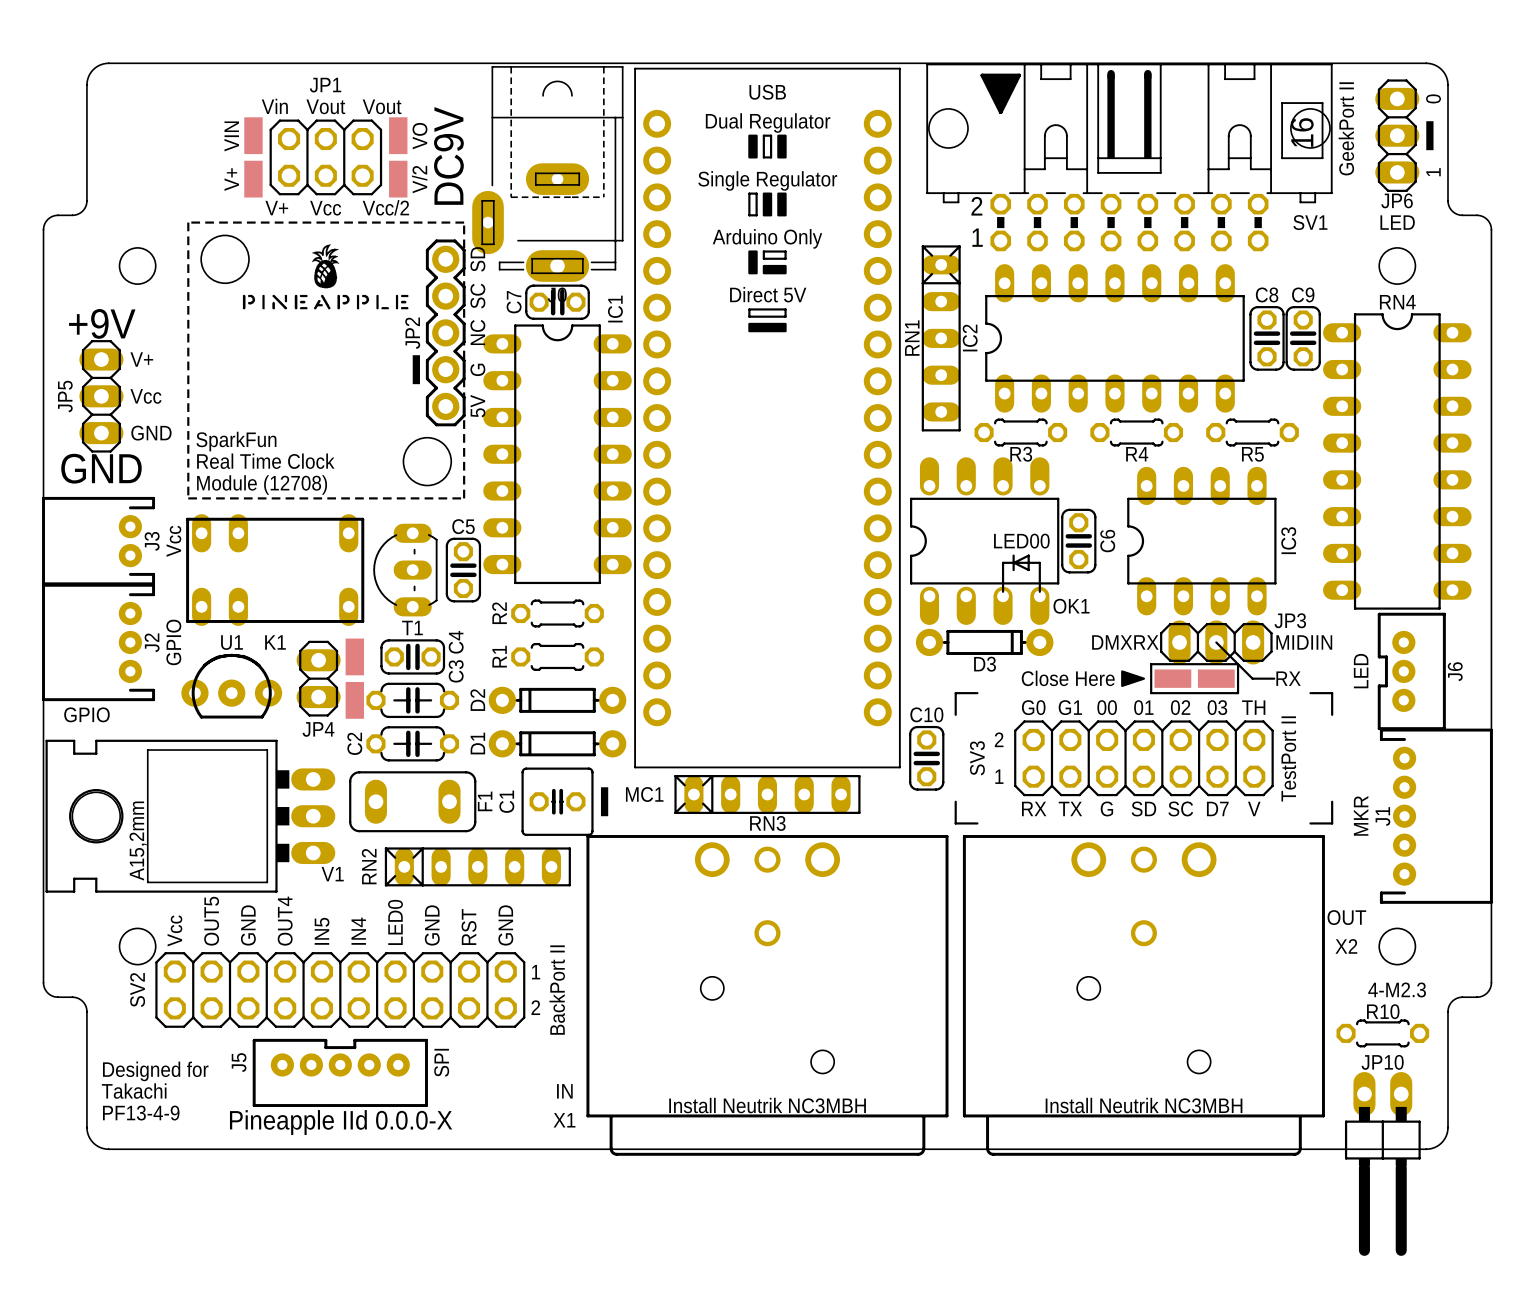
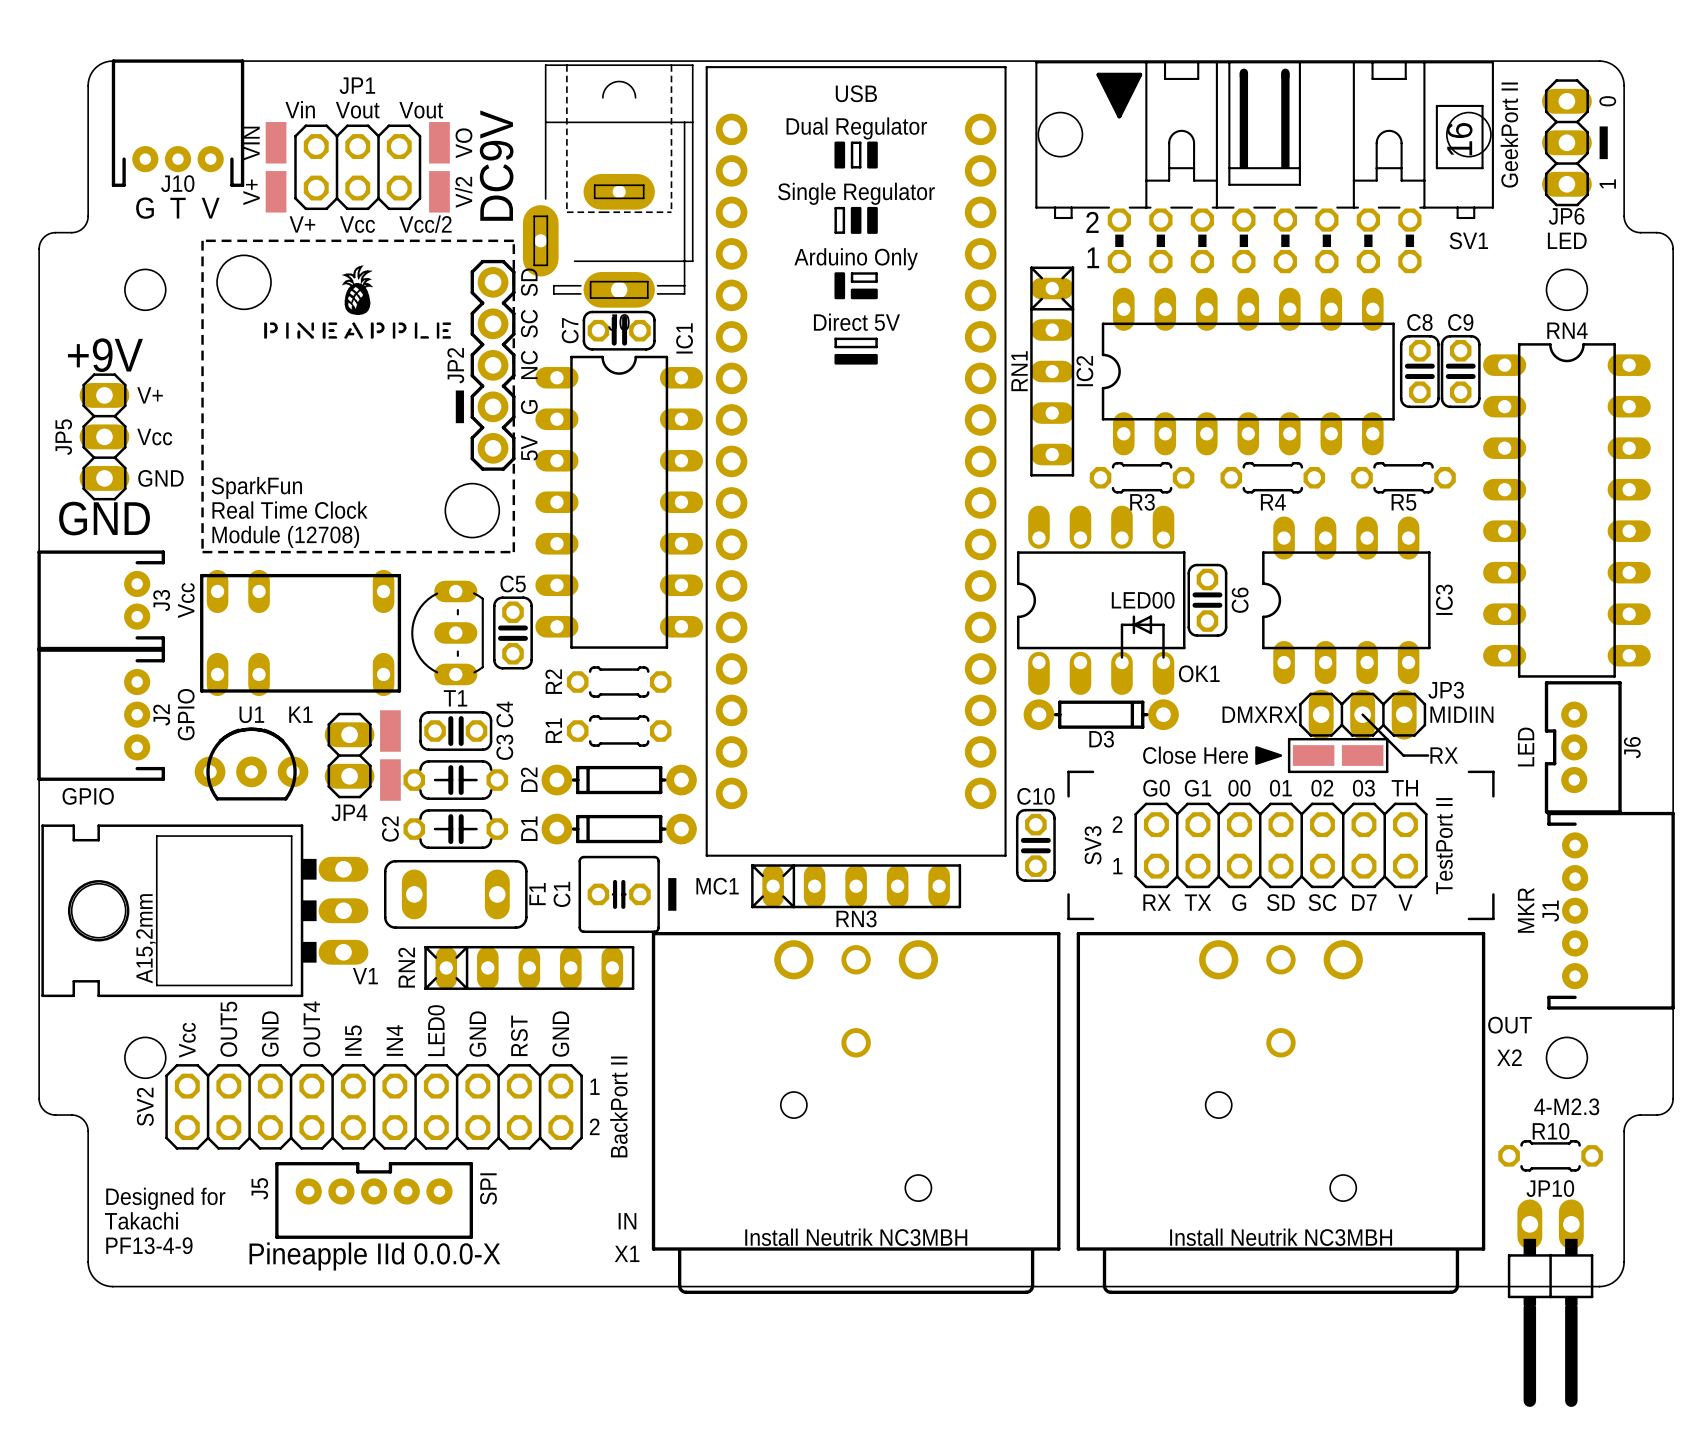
J10: none -> (178, 123)
text: none -> G (145, 208)
text: none -> T (178, 208)
text: none -> V (210, 208)

